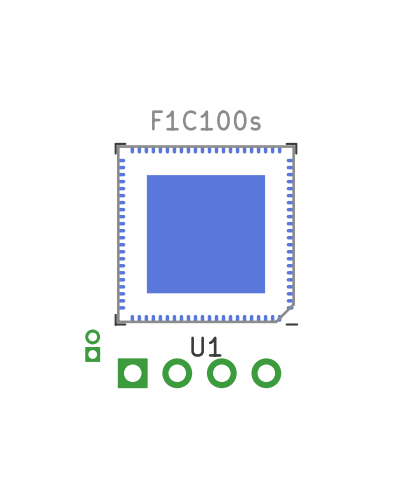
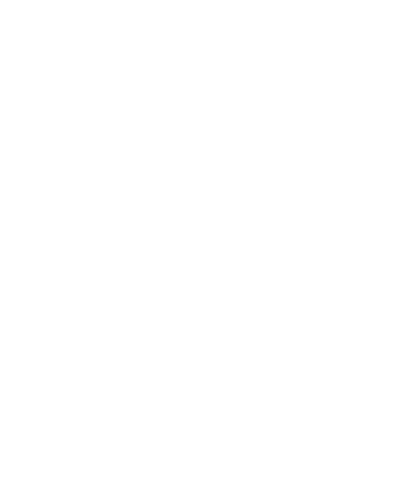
U1: F1C100s (206, 234) -> none
part: (92, 345) -> none
part: (199, 373) -> none

